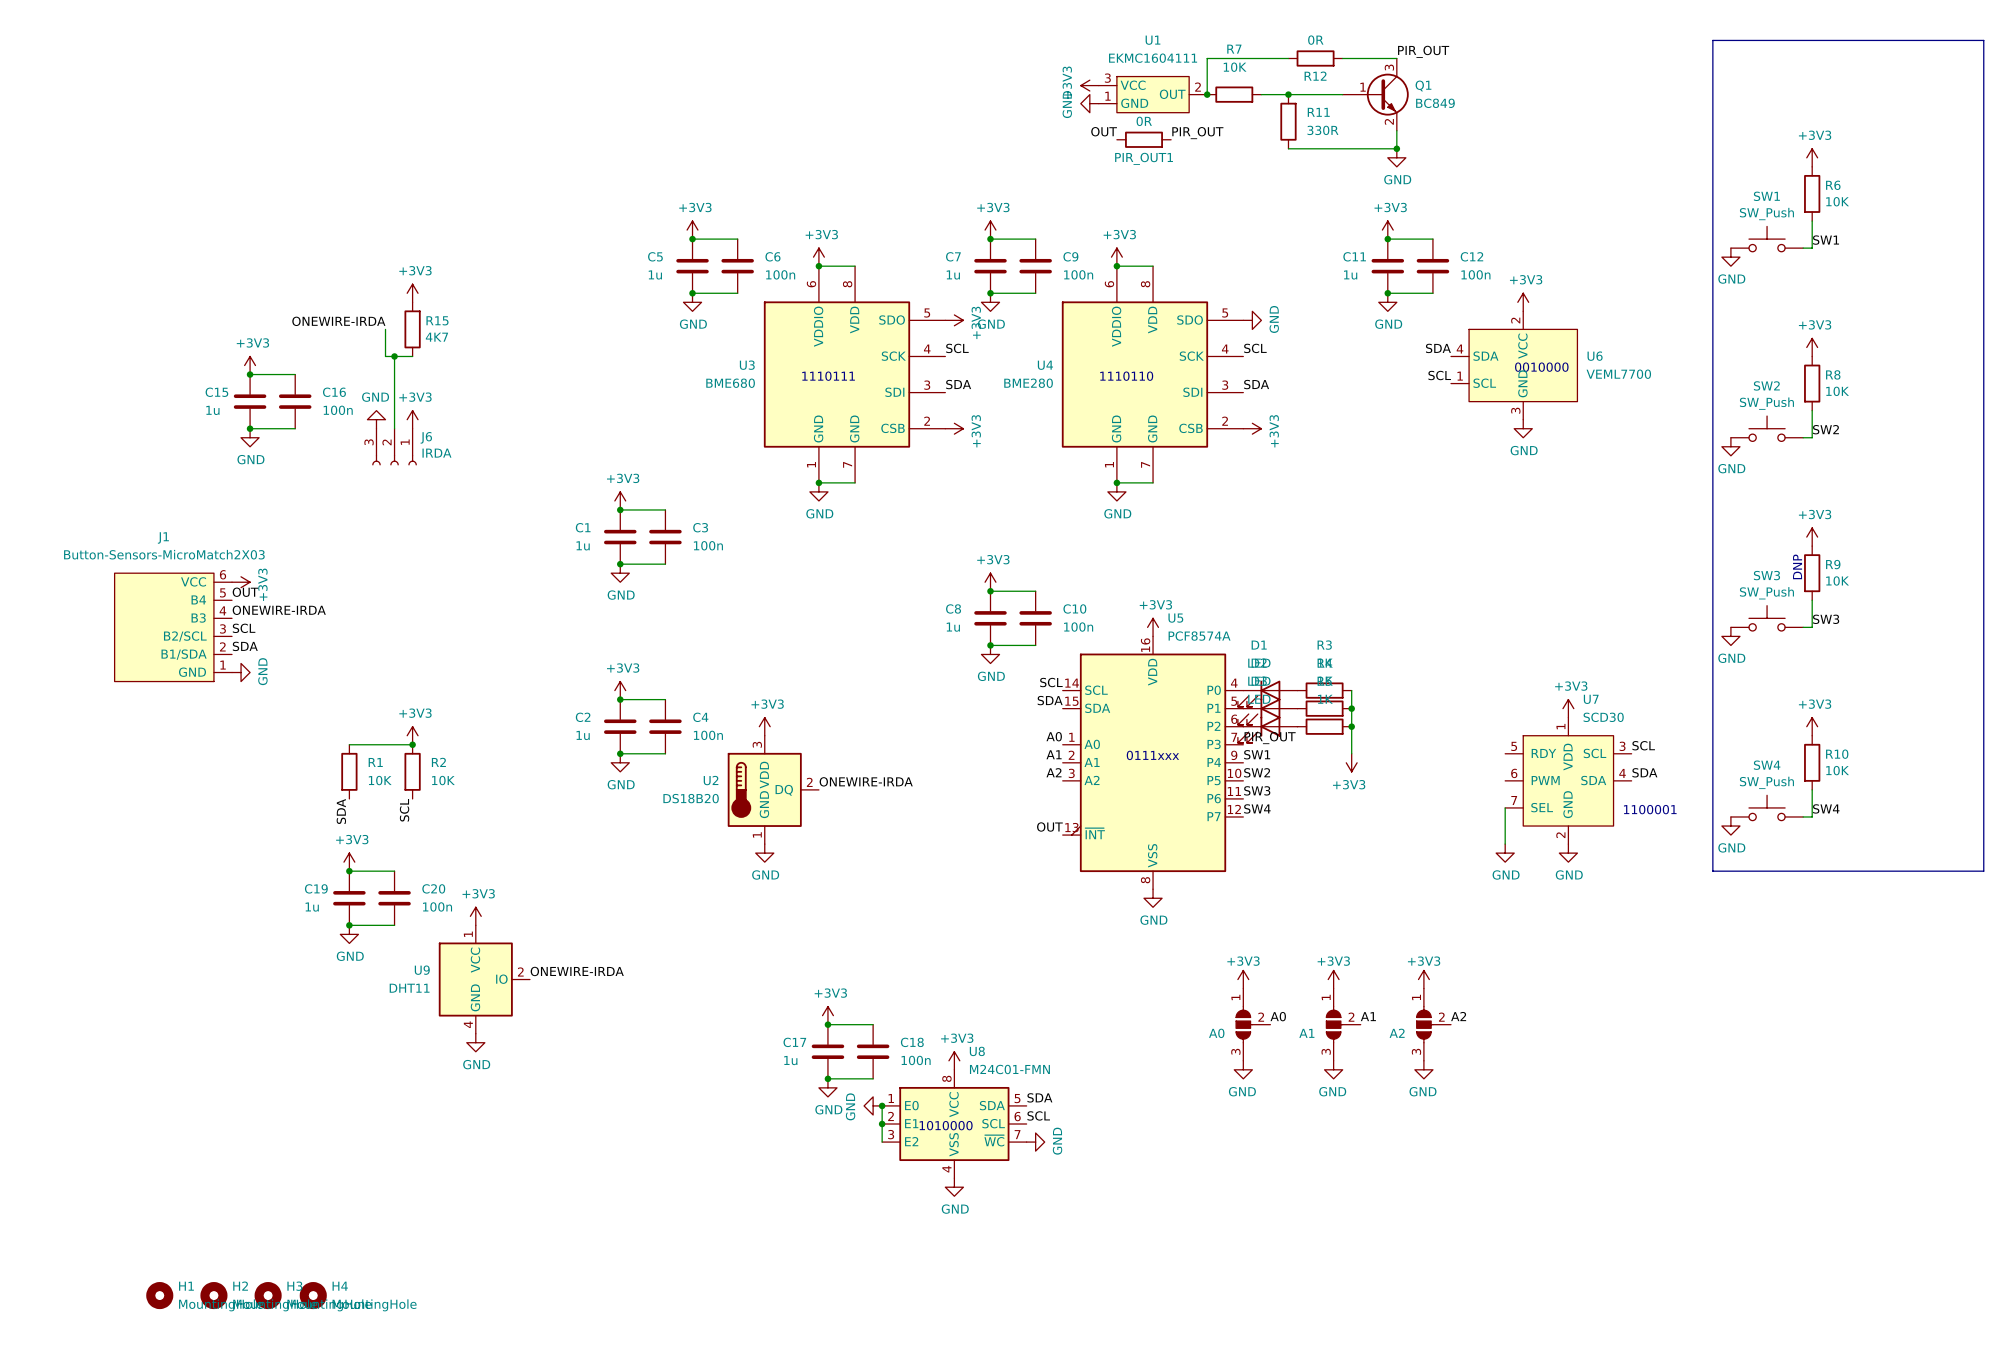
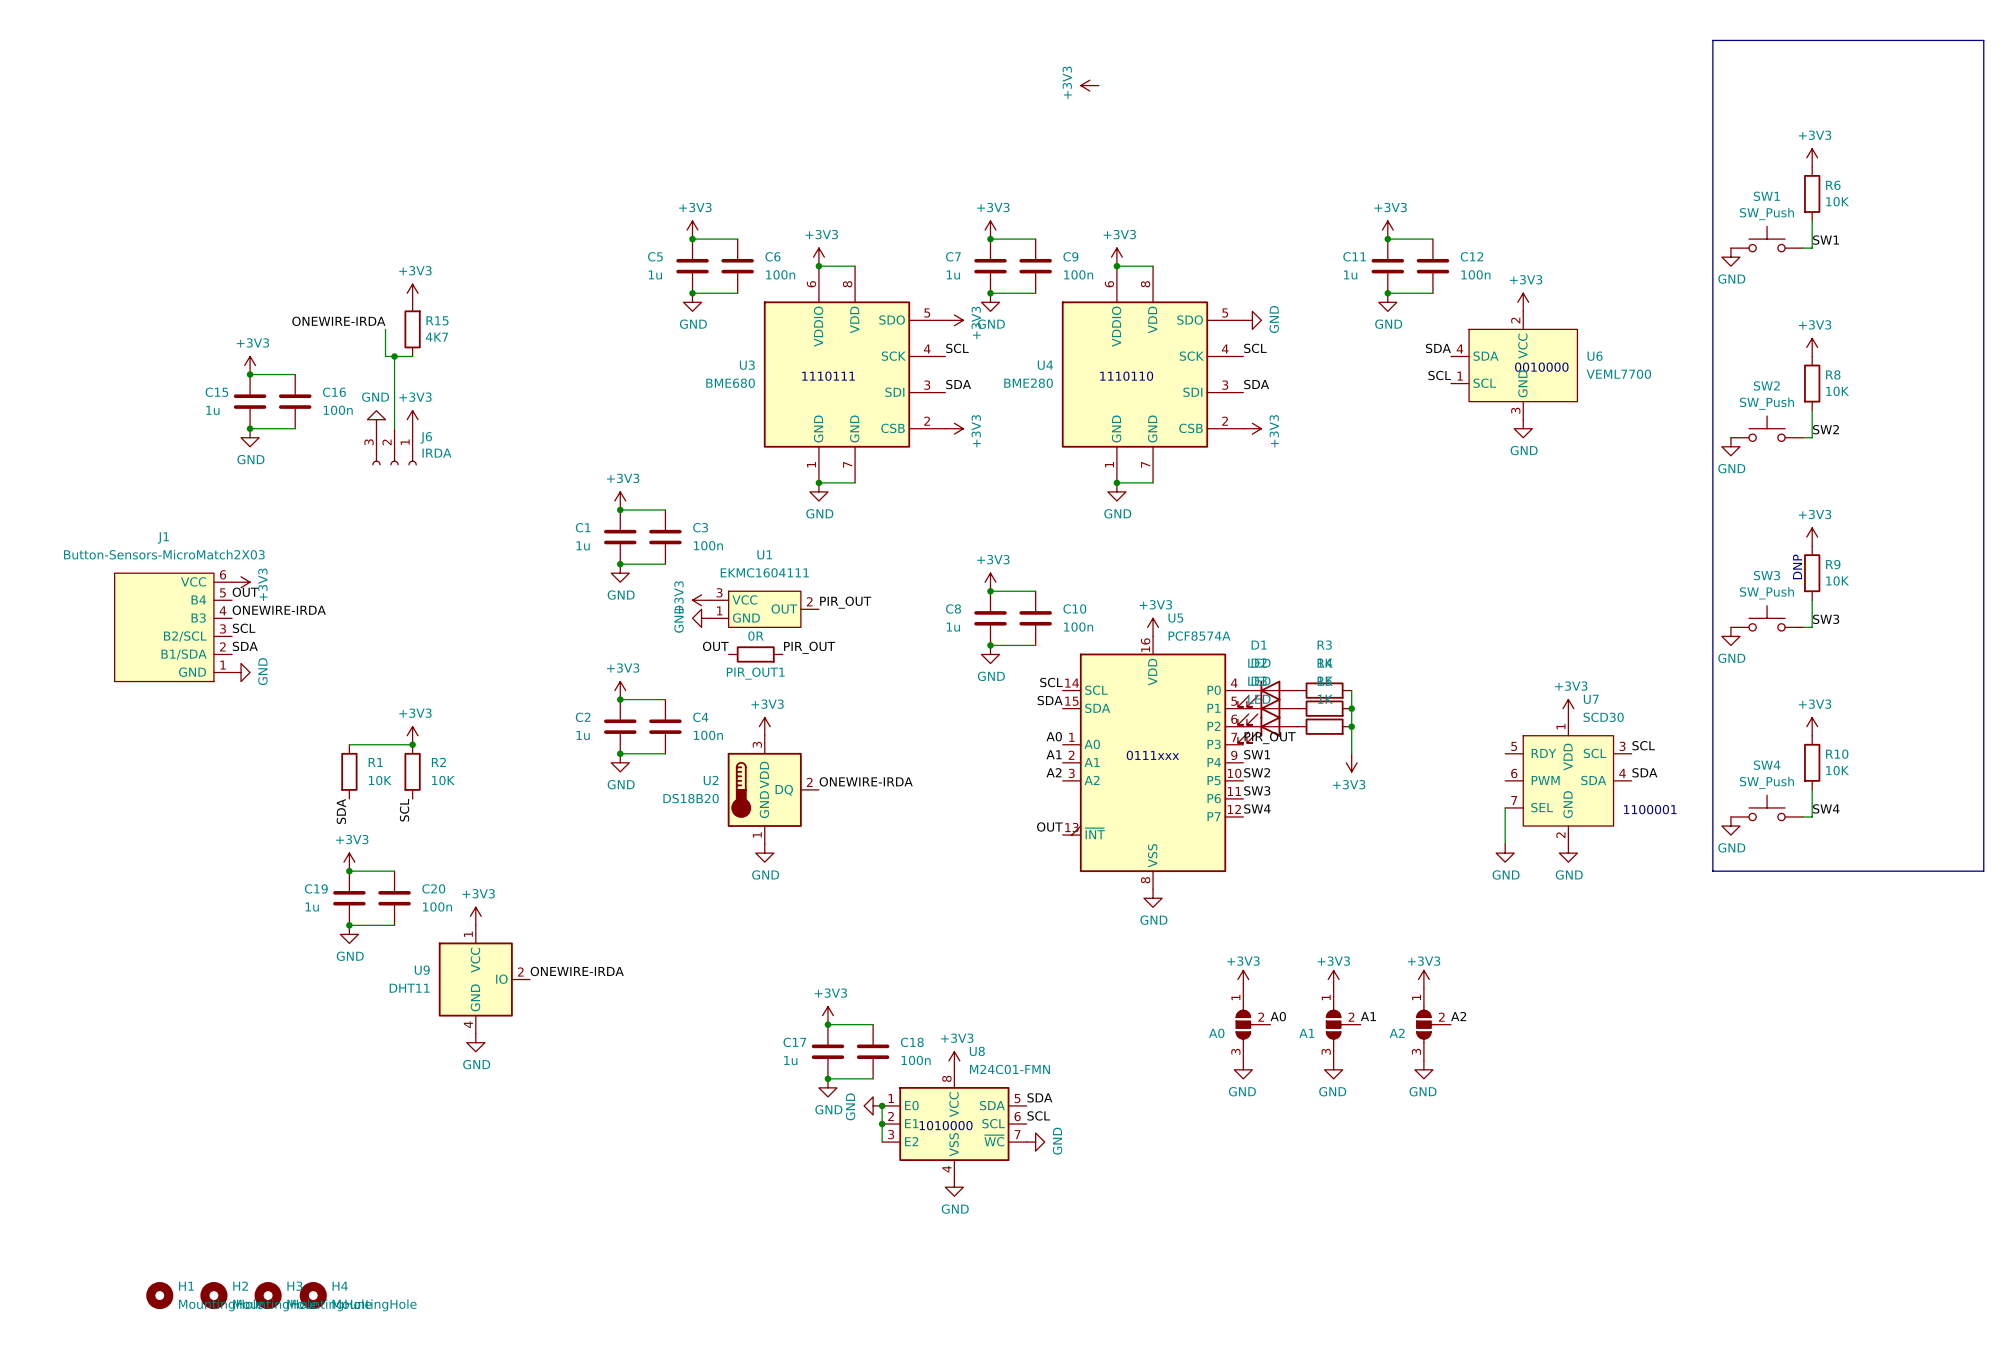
label: PIR_OUT (1423, 51) -> none
wire: (1288, 58) (1207, 58) (1207, 94) -> none
R12: 0R (1315, 58) -> none
wire: (1342, 58) (1396, 58) -> none
U1 position: (1153, 94) -> (764, 609)
junction: (1207, 94) -> none
R7: 10K (1234, 94) -> none
wire: (1261, 94) (1342, 94) -> none
junction: (1288, 94) -> none
Q1: BC849 (1375, 94) -> none
power symbol: GND (1089, 103) -> none
R11: 330R (1288, 121) -> none
wire: (1396, 130) (1396, 148) (1288, 148) -> none
label: OUT (1104, 131) -> none
label: PIR_OUT (1197, 133) -> none
PIR_OUT1 position: (1144, 139) -> (755, 654)
junction: (1396, 148) -> none
power symbol: GND (1396, 157) -> none
power symbol: none -> +3V3 (701, 600)
label: none -> PIR_OUT (845, 602)
power symbol: none -> GND (701, 618)
label: none -> OUT (715, 646)
label: none -> PIR_OUT (809, 647)

